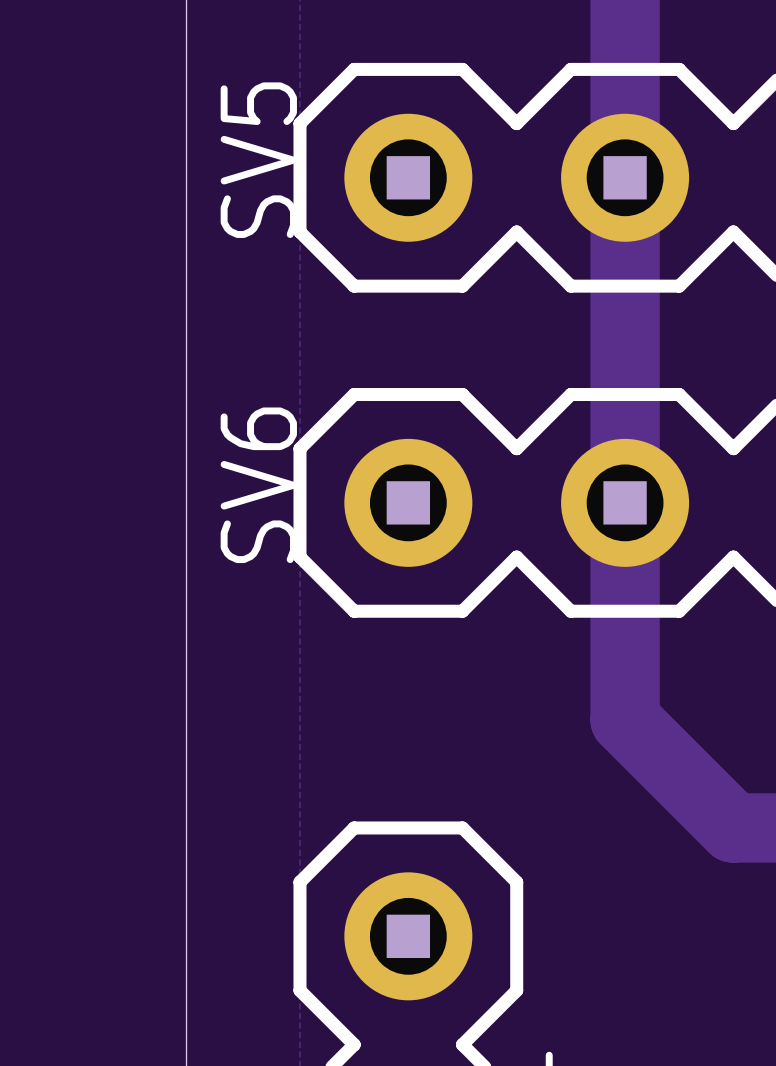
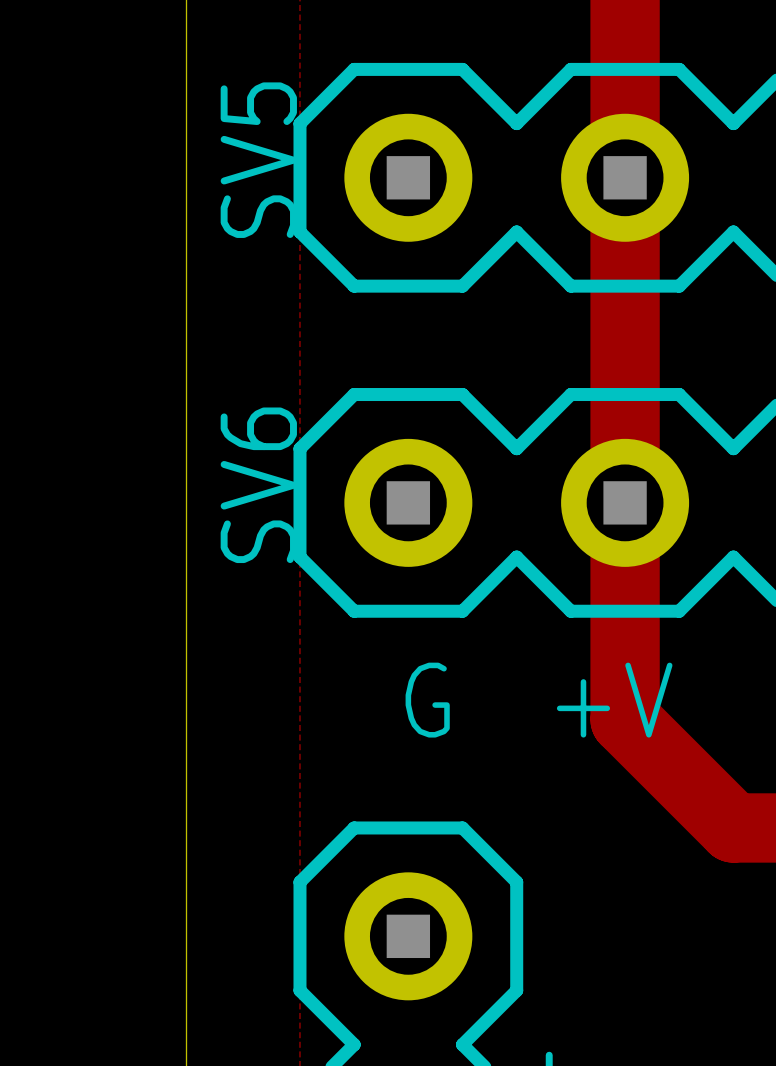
text: none -> G (427, 700)
text: none -> +V (614, 700)

